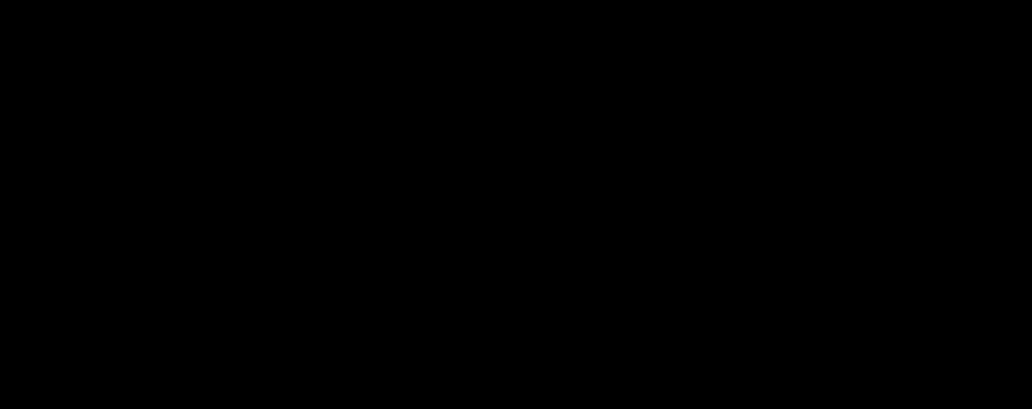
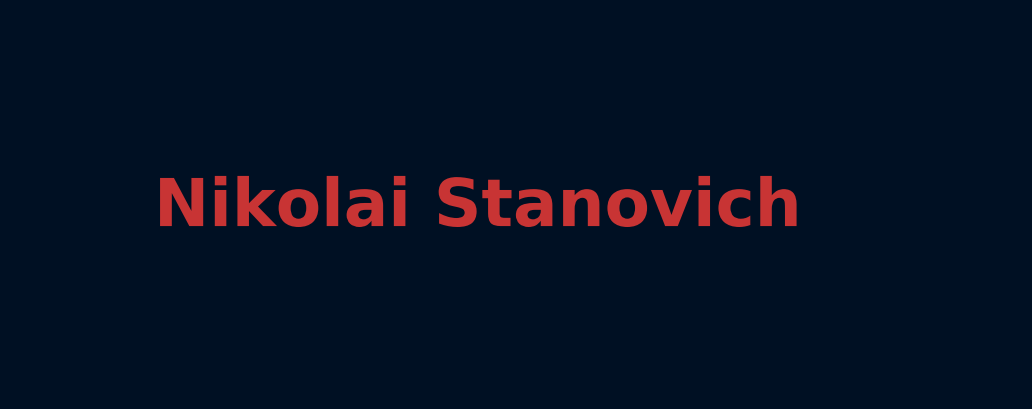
text: none -> Nikolai Stanovich (478, 201)

